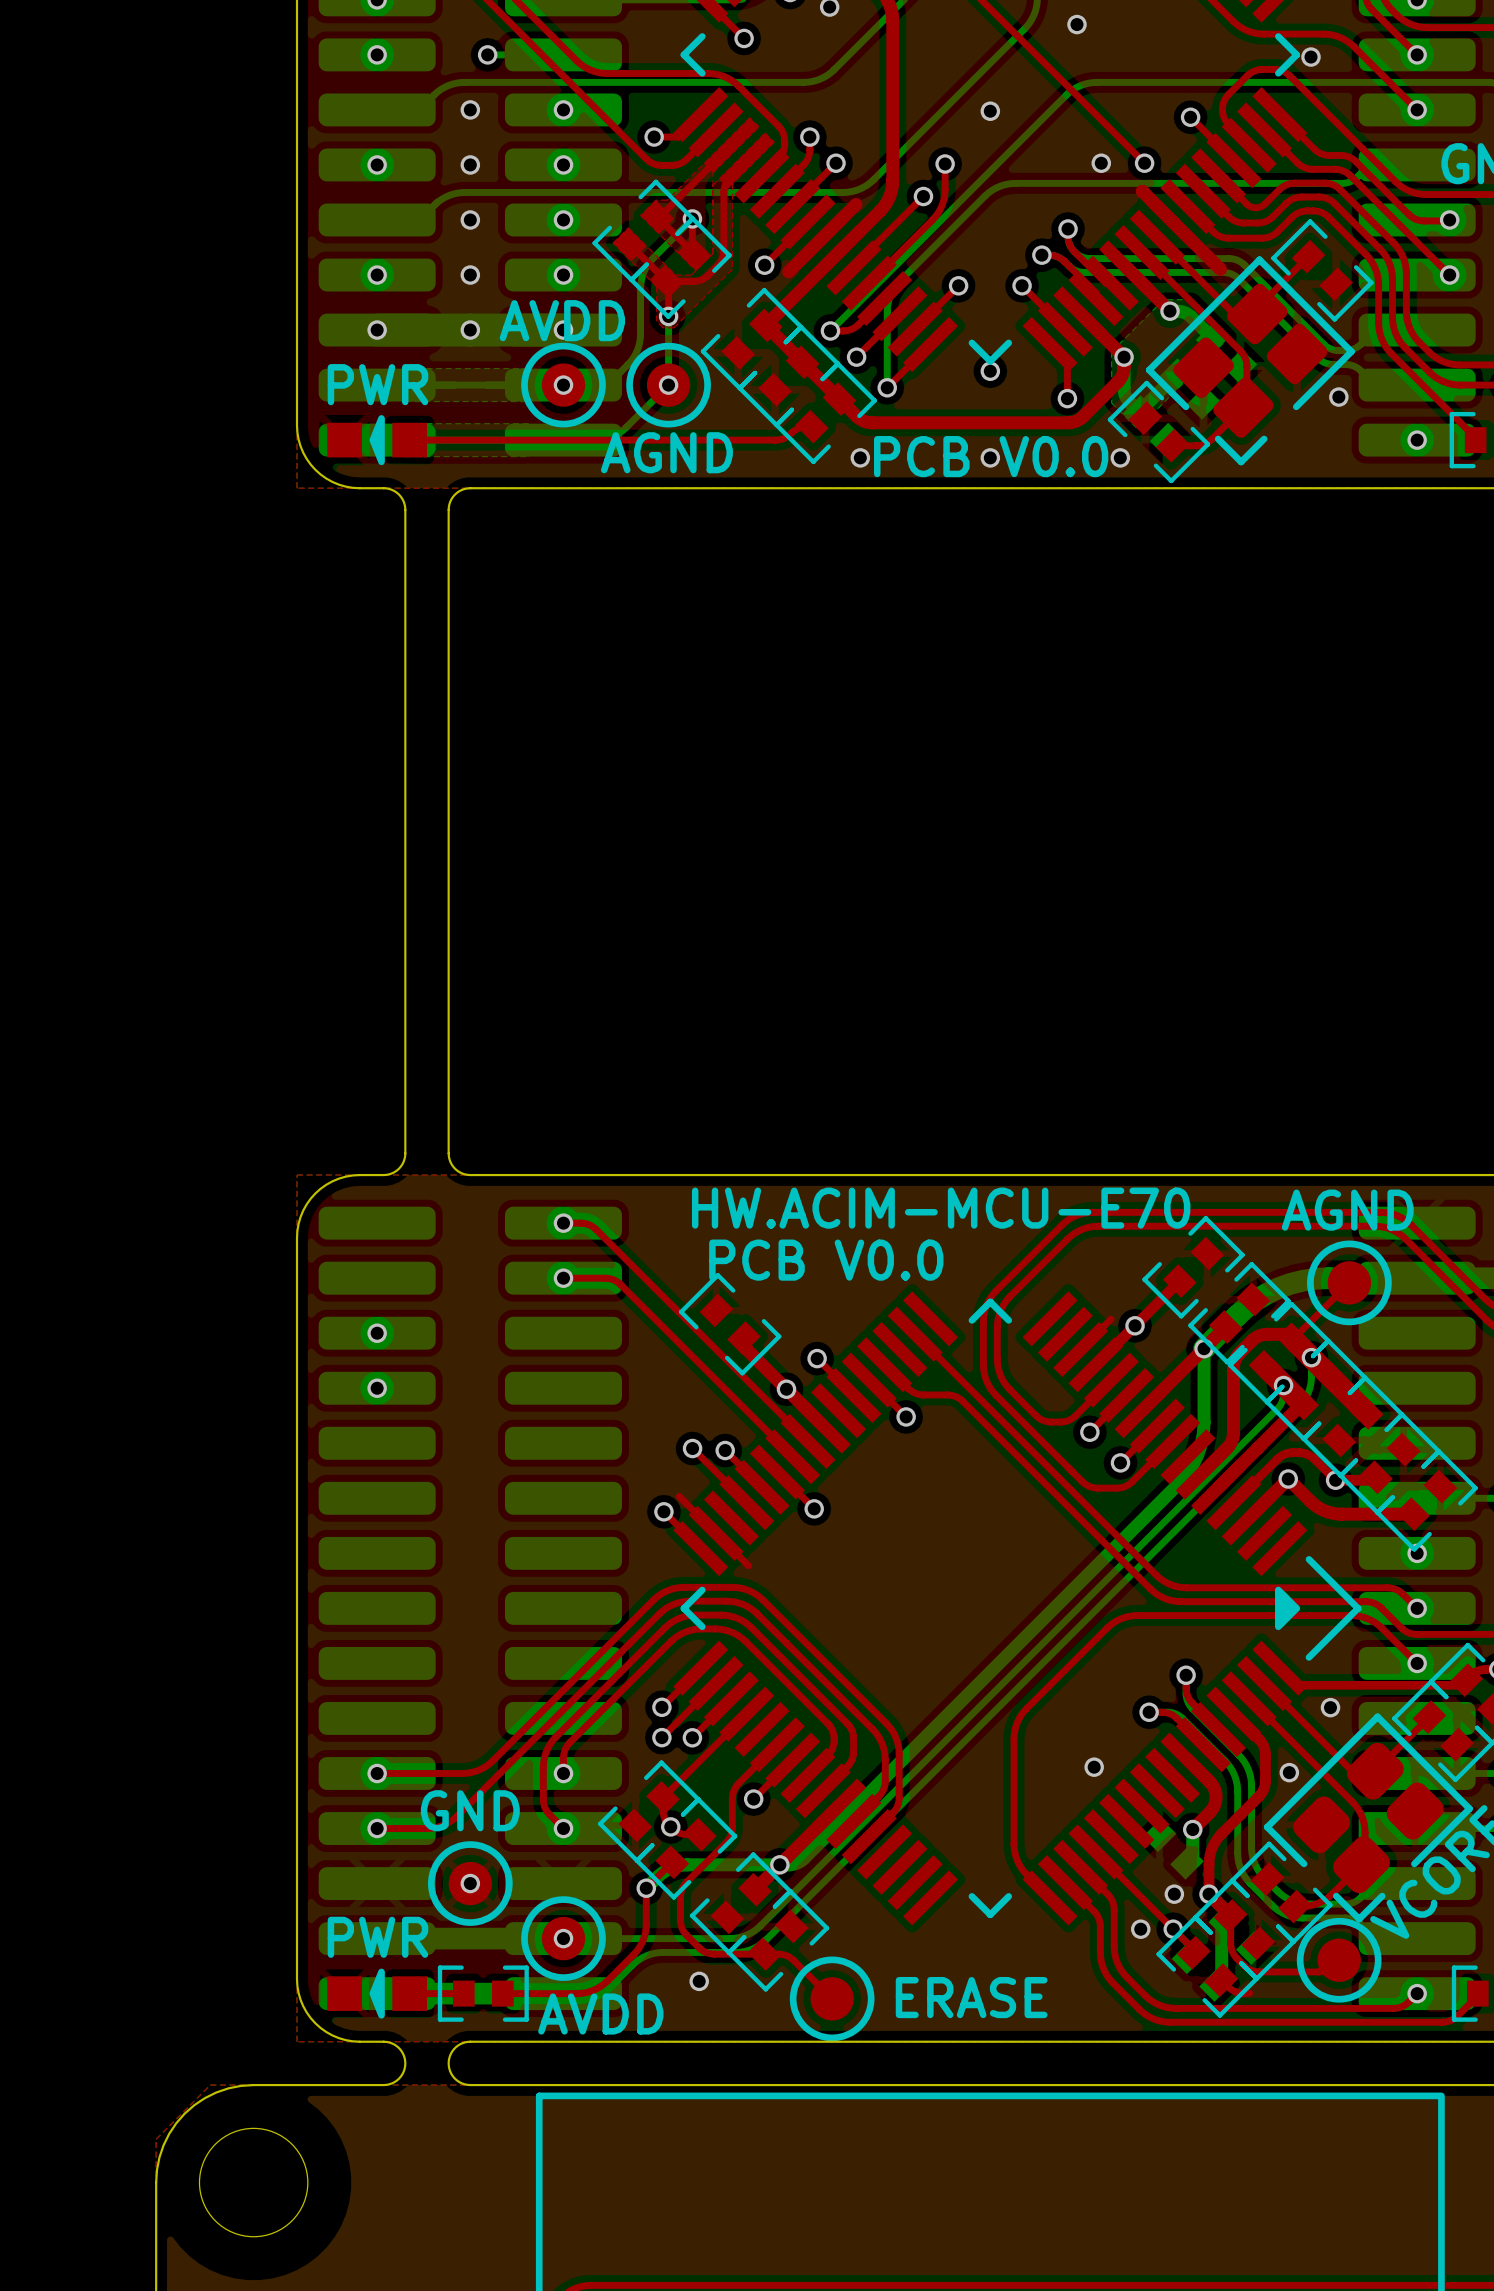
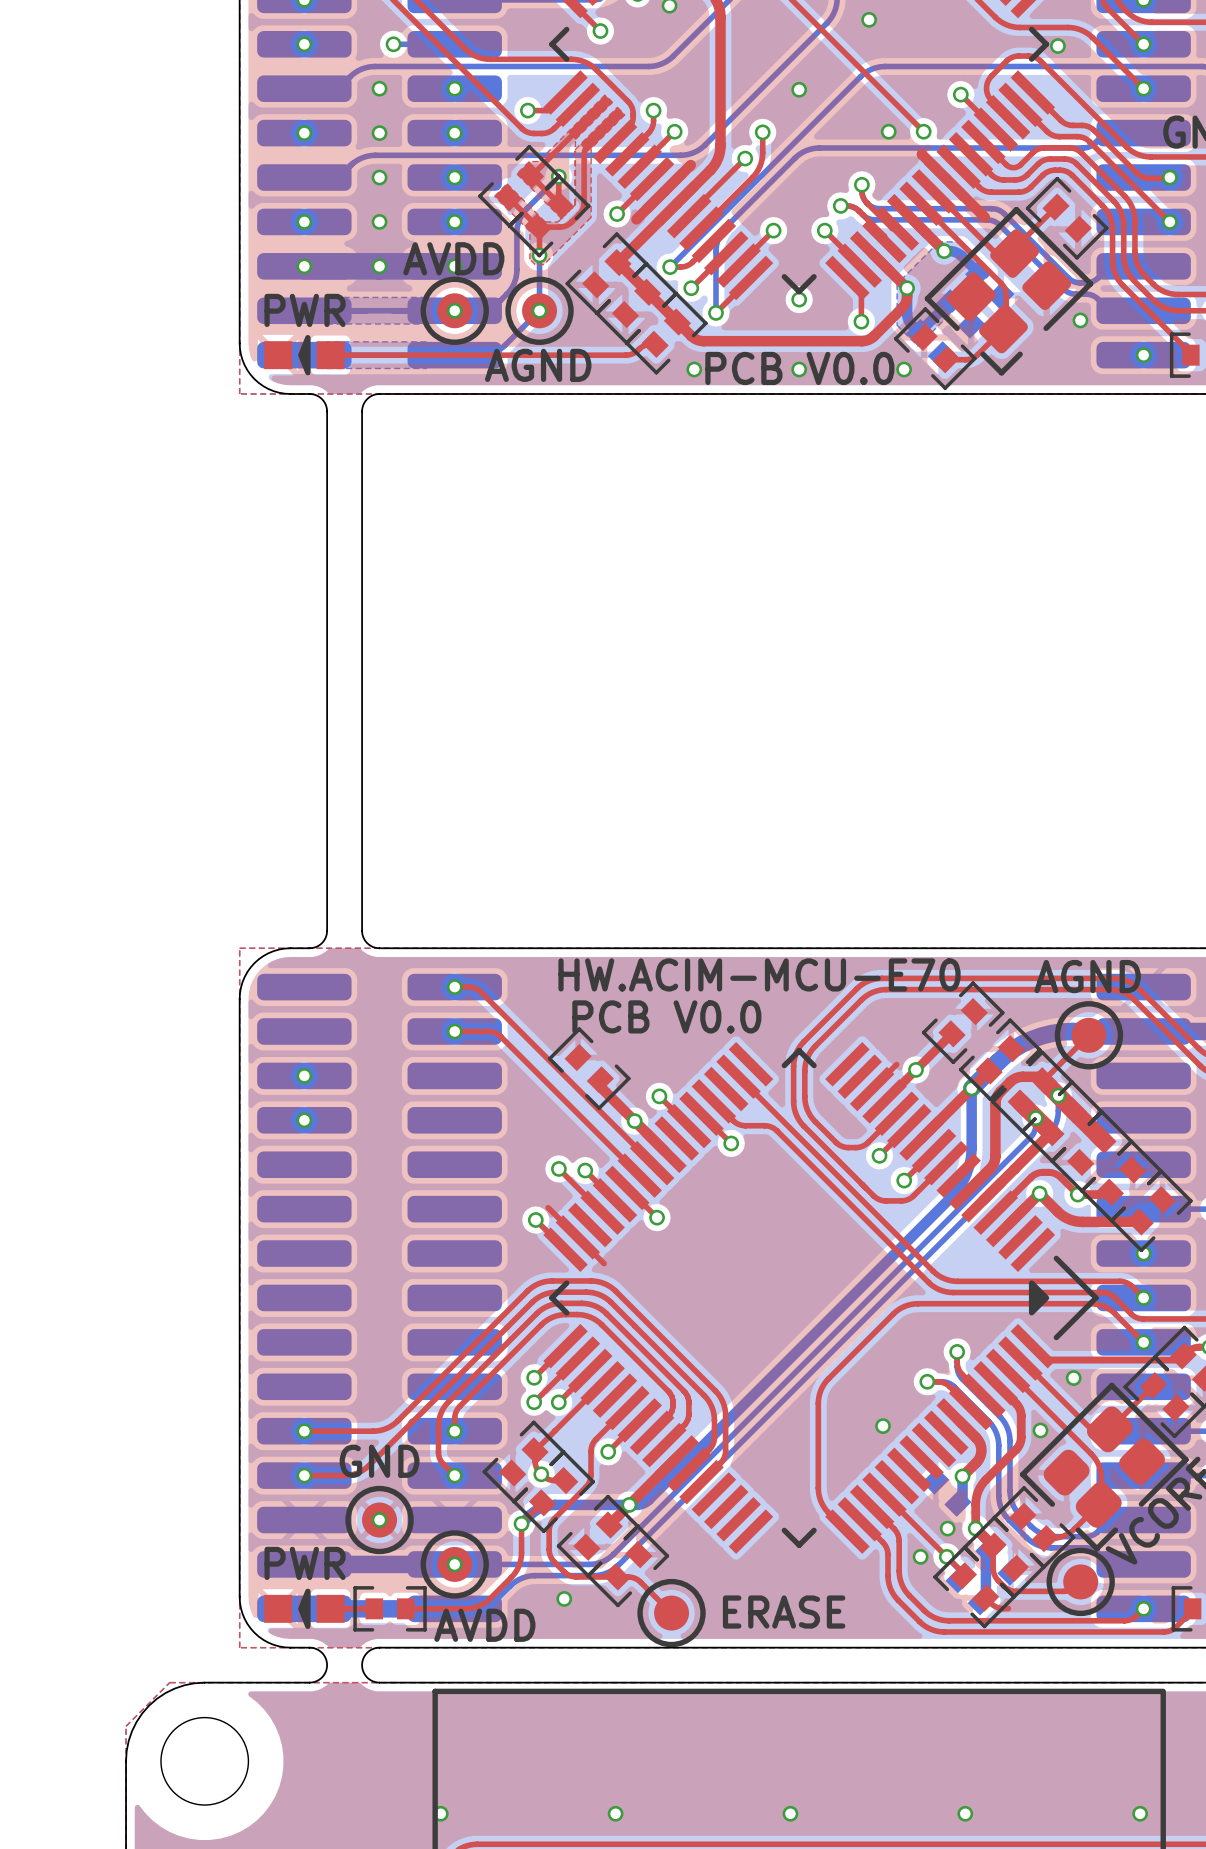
via: none -> (440, 1813)
via: none -> (615, 1813)
via: none -> (790, 1813)
via: none -> (965, 1813)
via: none -> (1140, 1813)

